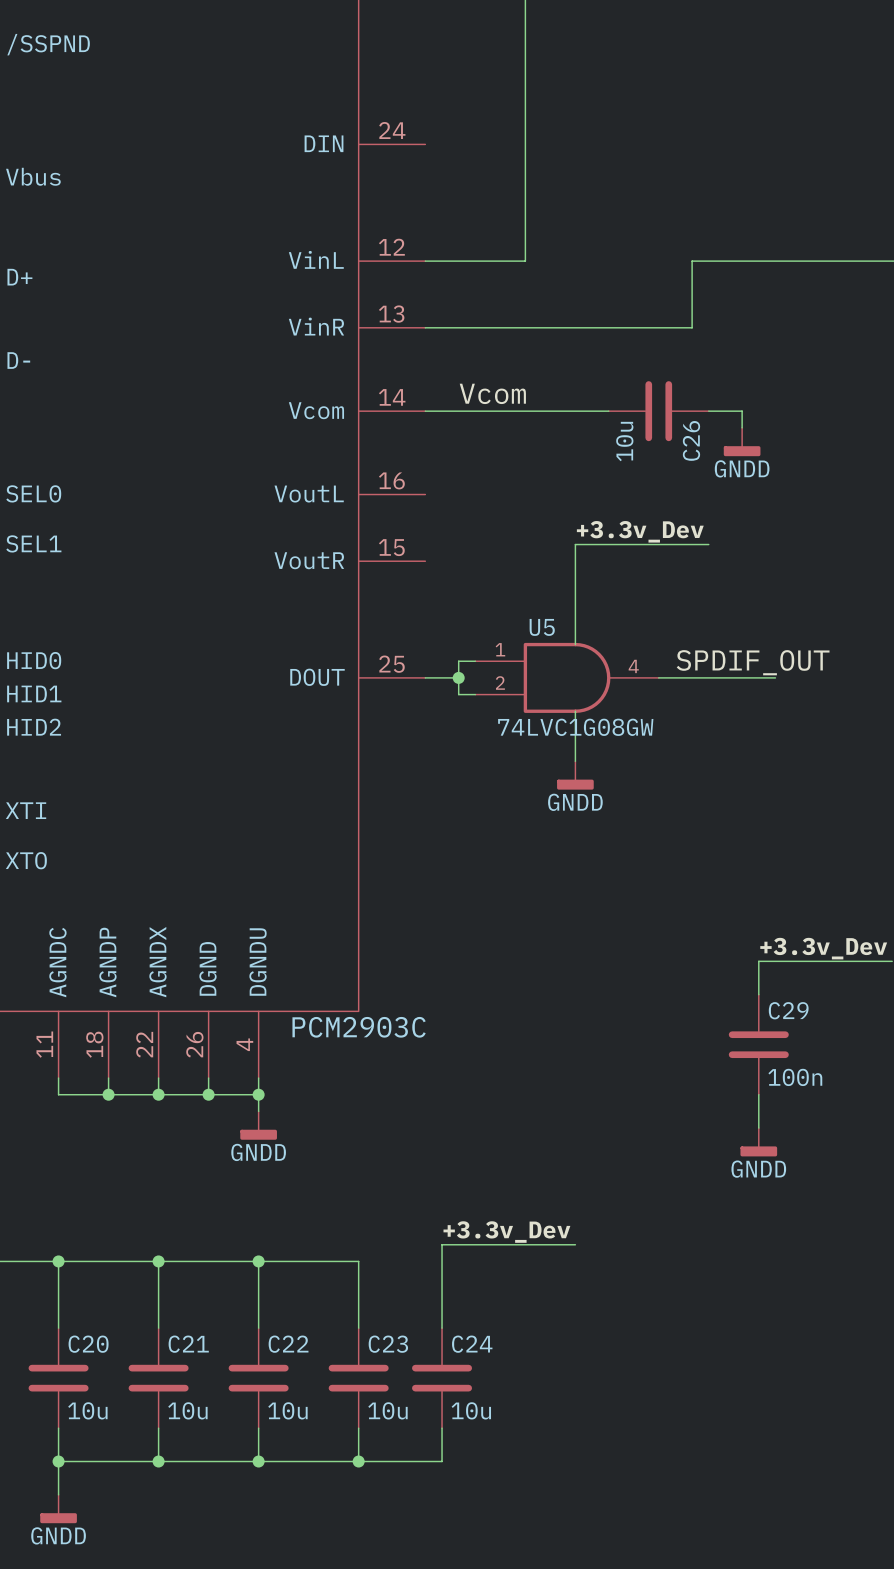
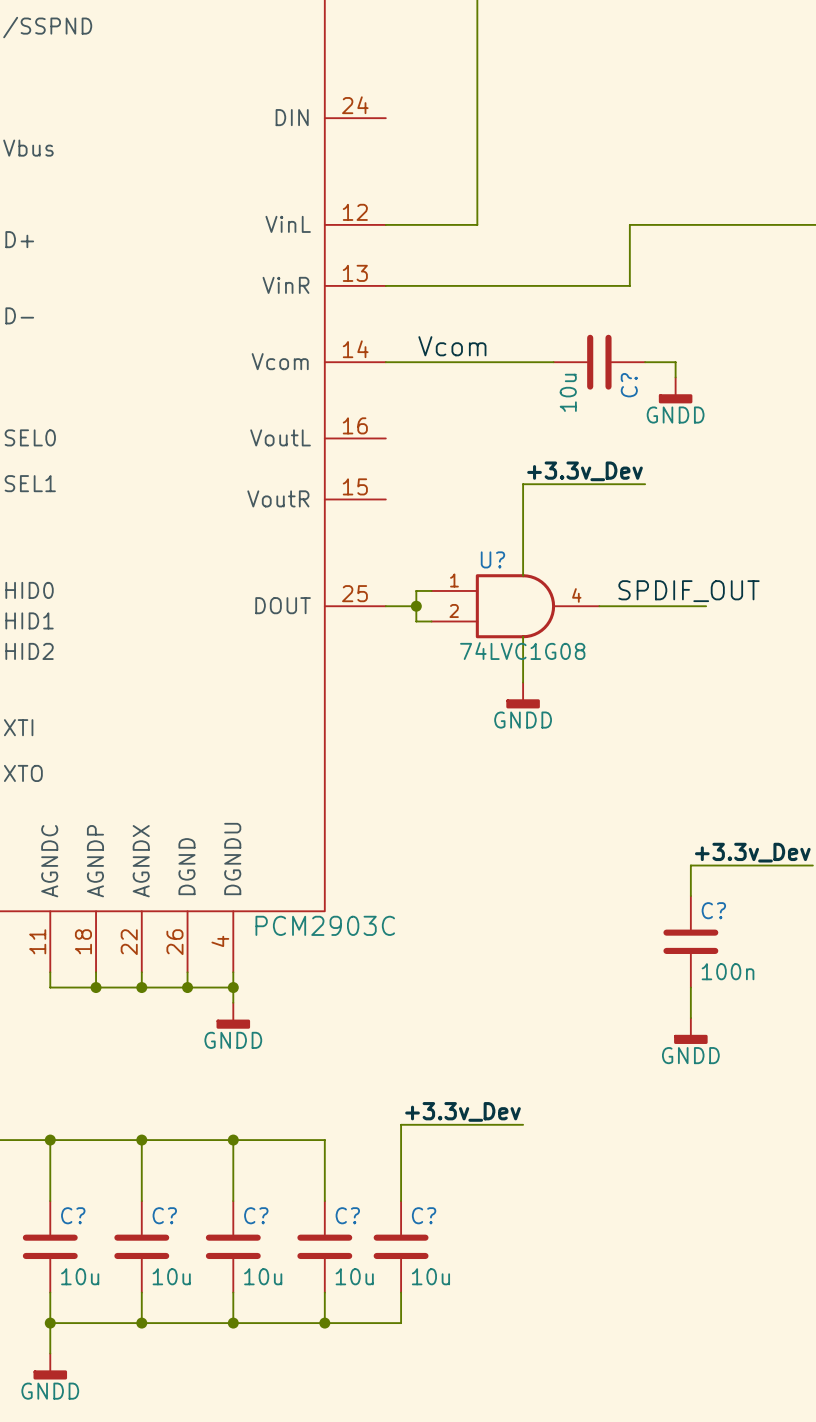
C26 name: C26 (691, 440) -> C? (629, 385)
U5 name: U5 (542, 627) -> U? (492, 559)
U5 value: 74LVC1G08GW (575, 727) -> 74LVC1G08 (522, 651)
C29 name: C29 (788, 1010) -> C? (713, 910)
C20 name: C20 (88, 1344) -> C? (73, 1215)
C21 name: C21 (188, 1344) -> C? (164, 1215)
C22 name: C22 (288, 1344) -> C? (256, 1215)
C23 name: C23 (388, 1344) -> C? (347, 1215)
C24 name: C24 (472, 1344) -> C? (424, 1215)

